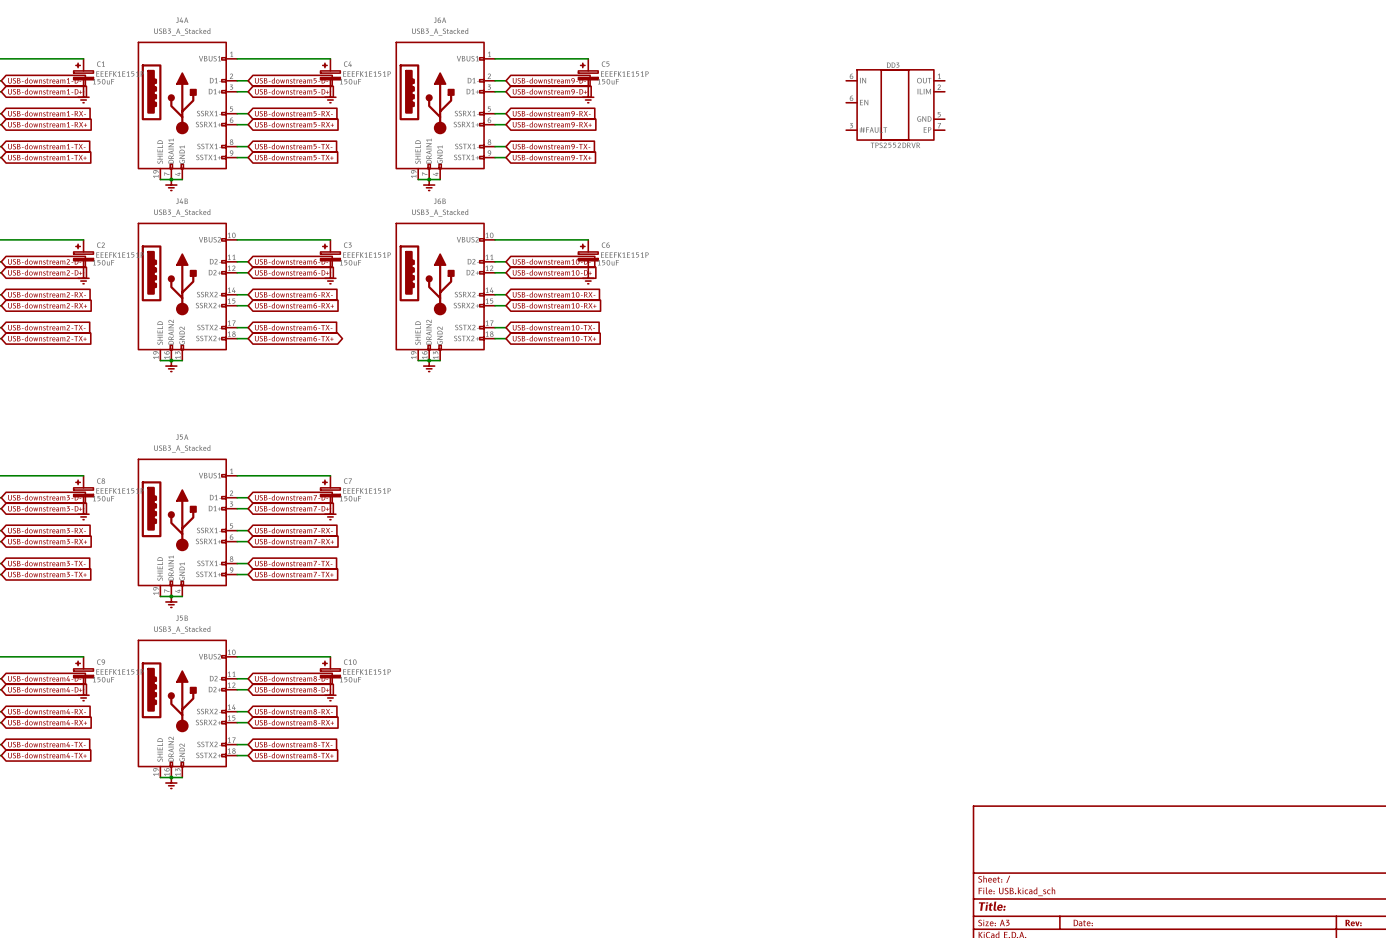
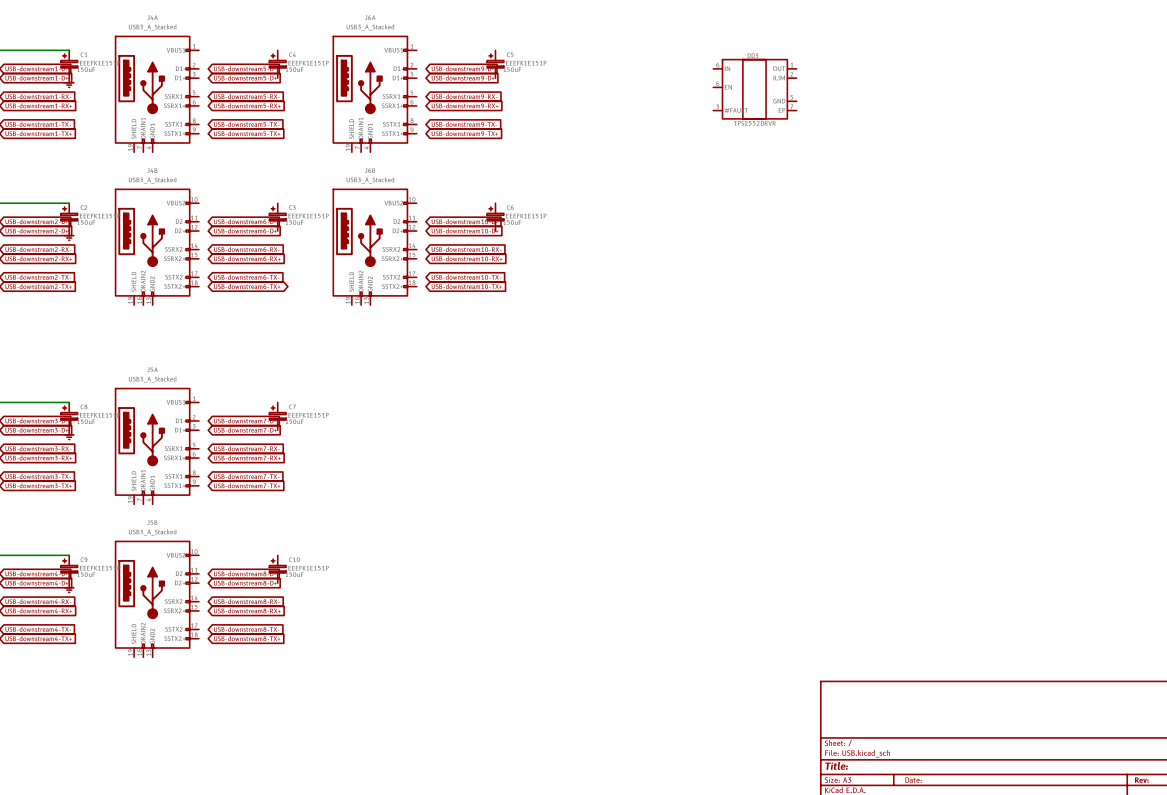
wire: (237, 58) (330, 58) -> none
wire: (495, 58) (588, 58) -> none
wire: (237, 80) (248, 80) -> none
wire: (495, 80) (505, 80) -> none
wire: (237, 91) (248, 91) -> none
wire: (495, 91) (505, 91) -> none
power symbol: (330, 97) -> none
power symbol: (588, 97) -> none
wire: (237, 113) (248, 113) -> none
wire: (495, 113) (505, 113) -> none
wire: (237, 124) (248, 124) -> none
wire: (495, 124) (505, 124) -> none
wire: (237, 146) (248, 146) -> none
wire: (495, 146) (505, 146) -> none
wire: (237, 157) (248, 157) -> none
wire: (495, 157) (505, 157) -> none
wire: (160, 179) (182, 179) -> none
junction: (171, 179) -> none
wire: (418, 179) (440, 179) -> none
junction: (429, 179) -> none
power symbol: (171, 185) -> none
power symbol: (429, 185) -> none
wire: (237, 239) (330, 239) -> none
wire: (495, 239) (588, 239) -> none
wire: (237, 261) (248, 261) -> none
wire: (495, 261) (505, 261) -> none
wire: (237, 272) (248, 272) -> none
wire: (495, 272) (505, 272) -> none
power symbol: (330, 278) -> none
power symbol: (588, 278) -> none
wire: (237, 294) (248, 294) -> none
wire: (495, 294) (505, 294) -> none
wire: (237, 305) (248, 305) -> none
wire: (495, 305) (505, 305) -> none
wire: (237, 327) (248, 327) -> none
wire: (495, 327) (505, 327) -> none
wire: (237, 338) (248, 338) -> none
wire: (495, 338) (505, 338) -> none
wire: (160, 360) (182, 360) -> none
junction: (171, 360) -> none
wire: (418, 360) (440, 360) -> none
junction: (429, 360) -> none
power symbol: (171, 366) -> none
power symbol: (429, 366) -> none
wire: (237, 475) (330, 475) -> none
wire: (237, 497) (248, 497) -> none
wire: (237, 508) (248, 508) -> none
power symbol: (330, 514) -> none
wire: (237, 530) (248, 530) -> none
wire: (237, 541) (248, 541) -> none
wire: (237, 563) (248, 563) -> none
wire: (237, 574) (248, 574) -> none
wire: (160, 596) (182, 596) -> none
junction: (171, 596) -> none
power symbol: (171, 601) -> none
wire: (237, 656) (330, 656) -> none
wire: (237, 678) (248, 678) -> none
wire: (237, 689) (248, 689) -> none
power symbol: (330, 695) -> none
wire: (237, 711) (248, 711) -> none
wire: (237, 722) (248, 722) -> none
wire: (237, 744) (248, 744) -> none
wire: (237, 755) (248, 755) -> none
wire: (160, 777) (182, 777) -> none
junction: (171, 777) -> none
power symbol: (171, 783) -> none

